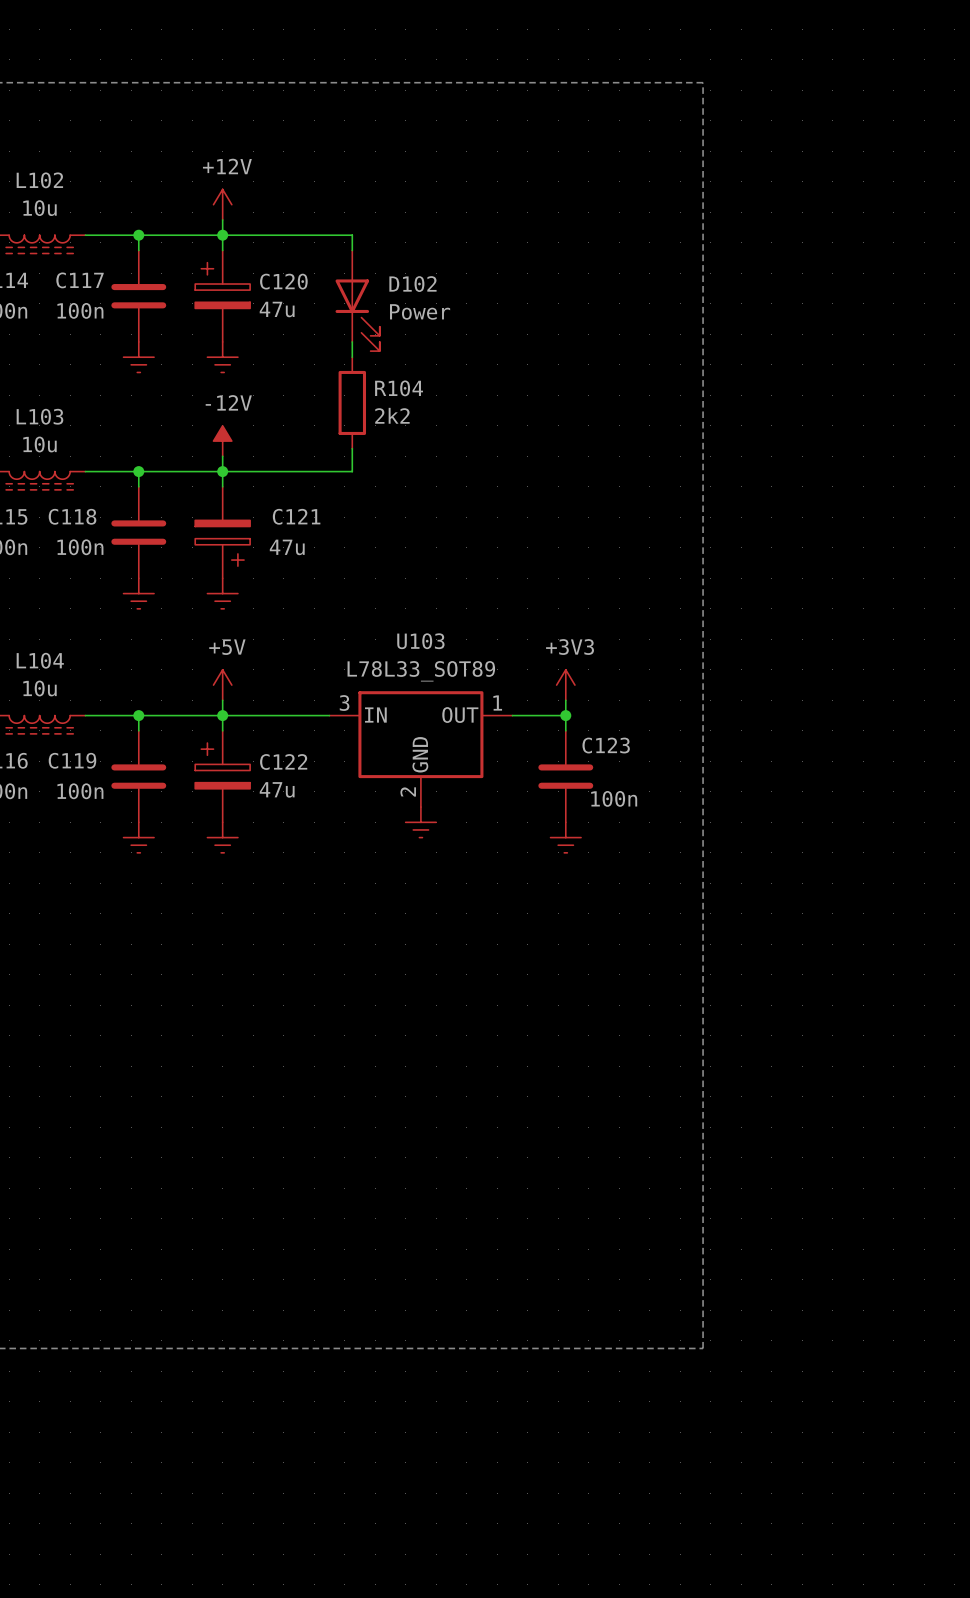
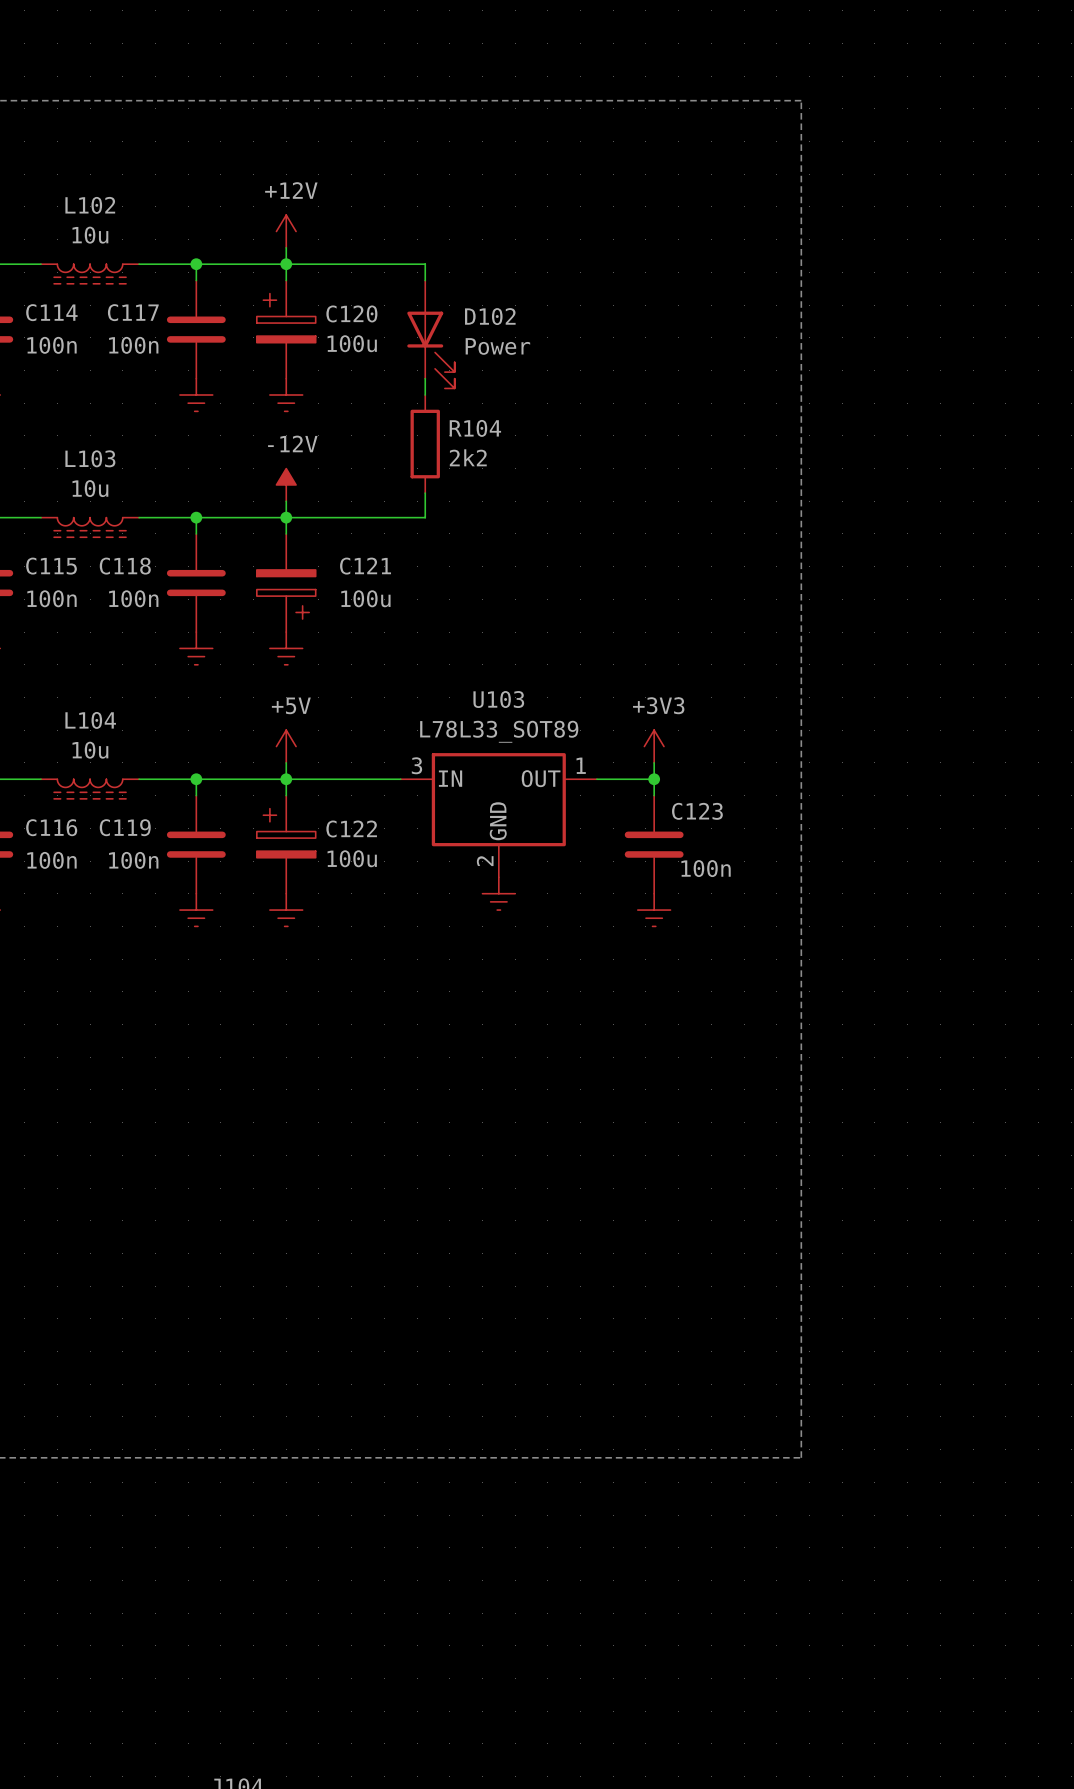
C120 value: 47u (277, 309) -> 100u (352, 343)
C121 value: 47u (287, 547) -> 100u (365, 598)
C122 value: 47u (277, 789) -> 100u (352, 858)

